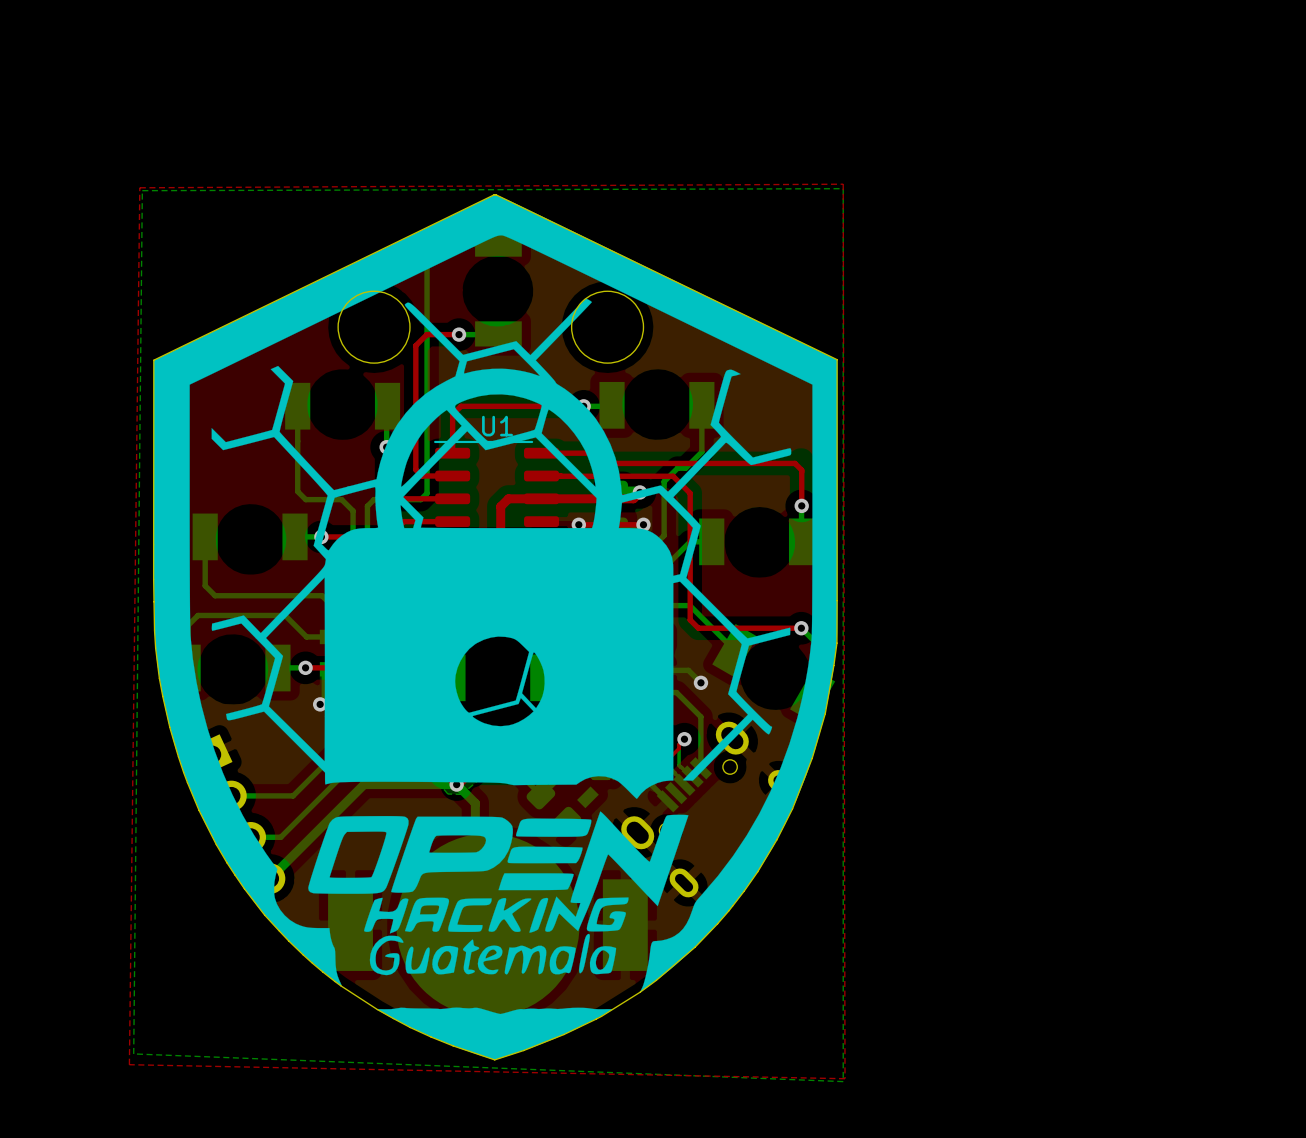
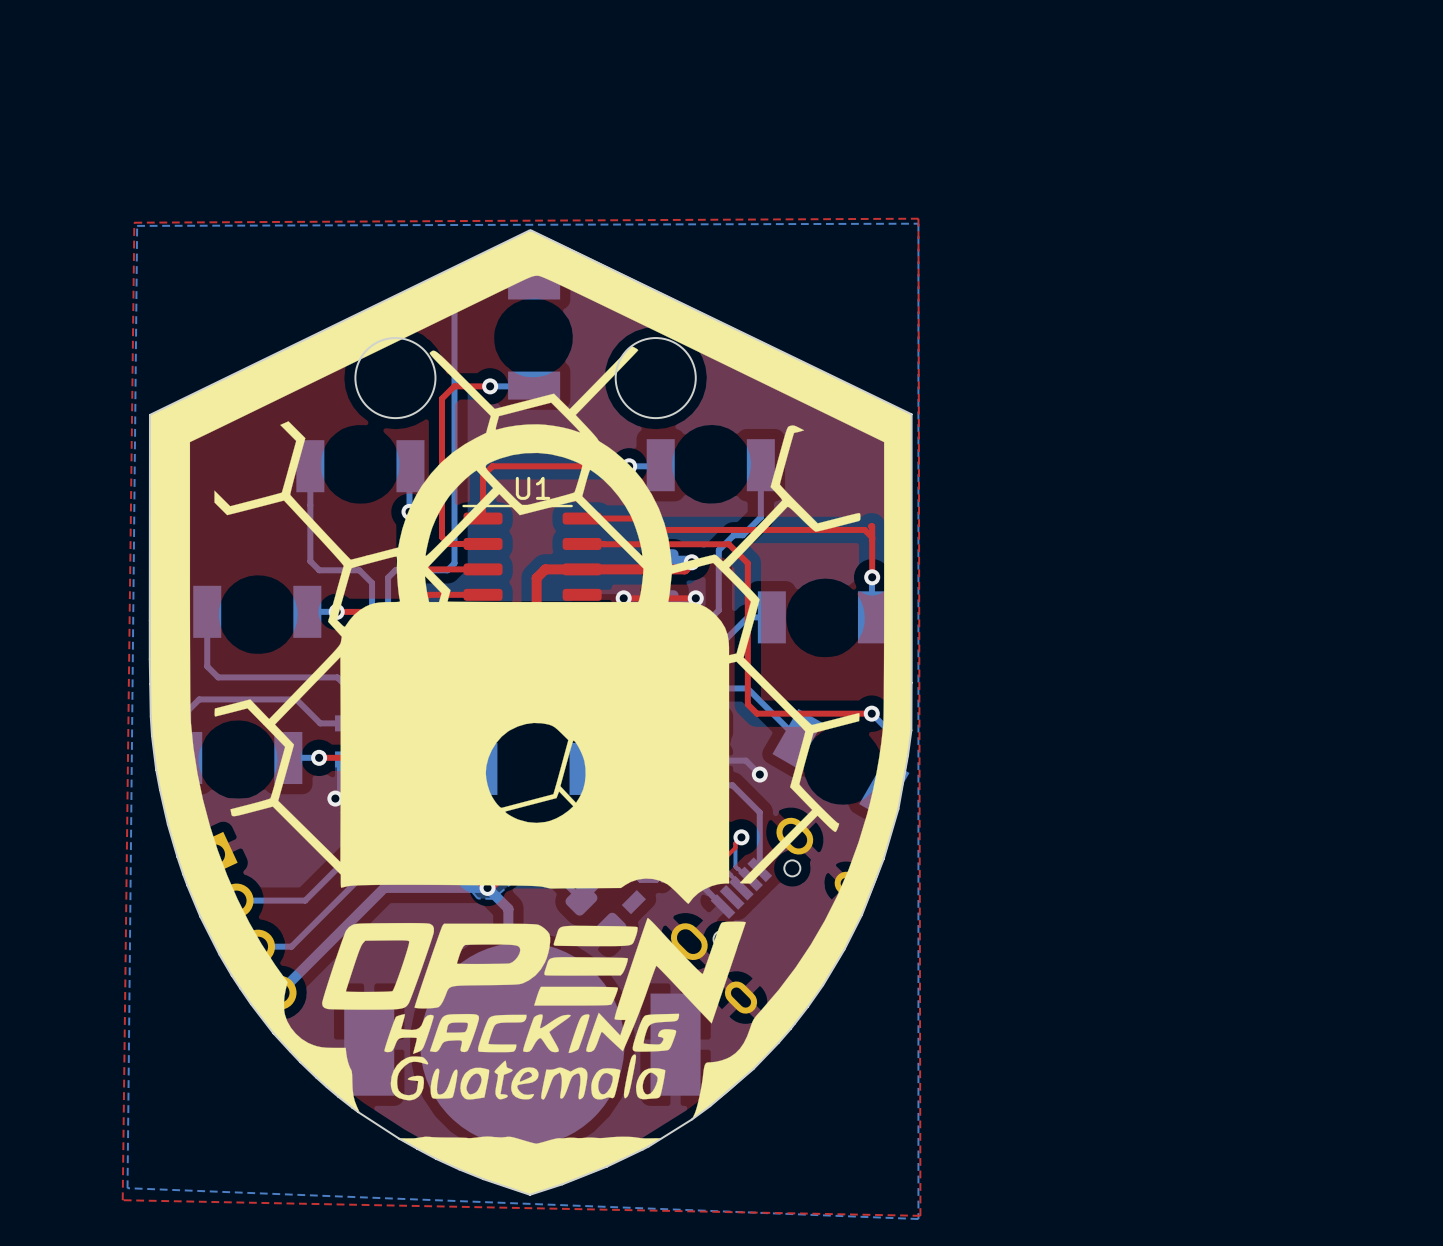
top track: none -> (870, 526) (872, 537)

